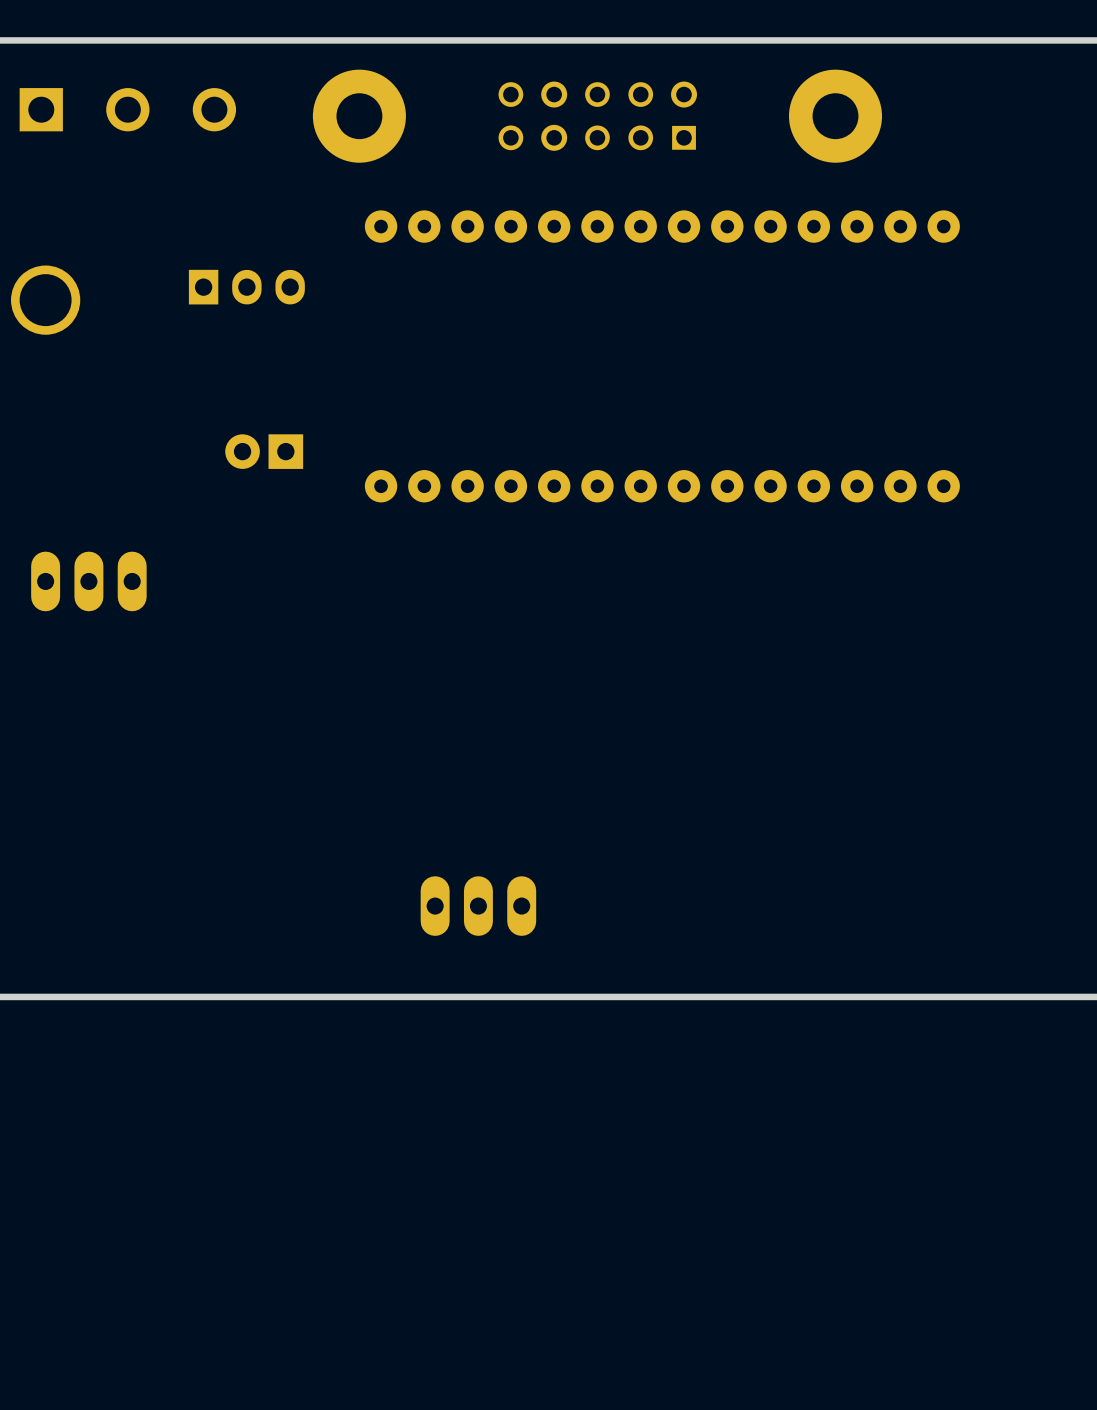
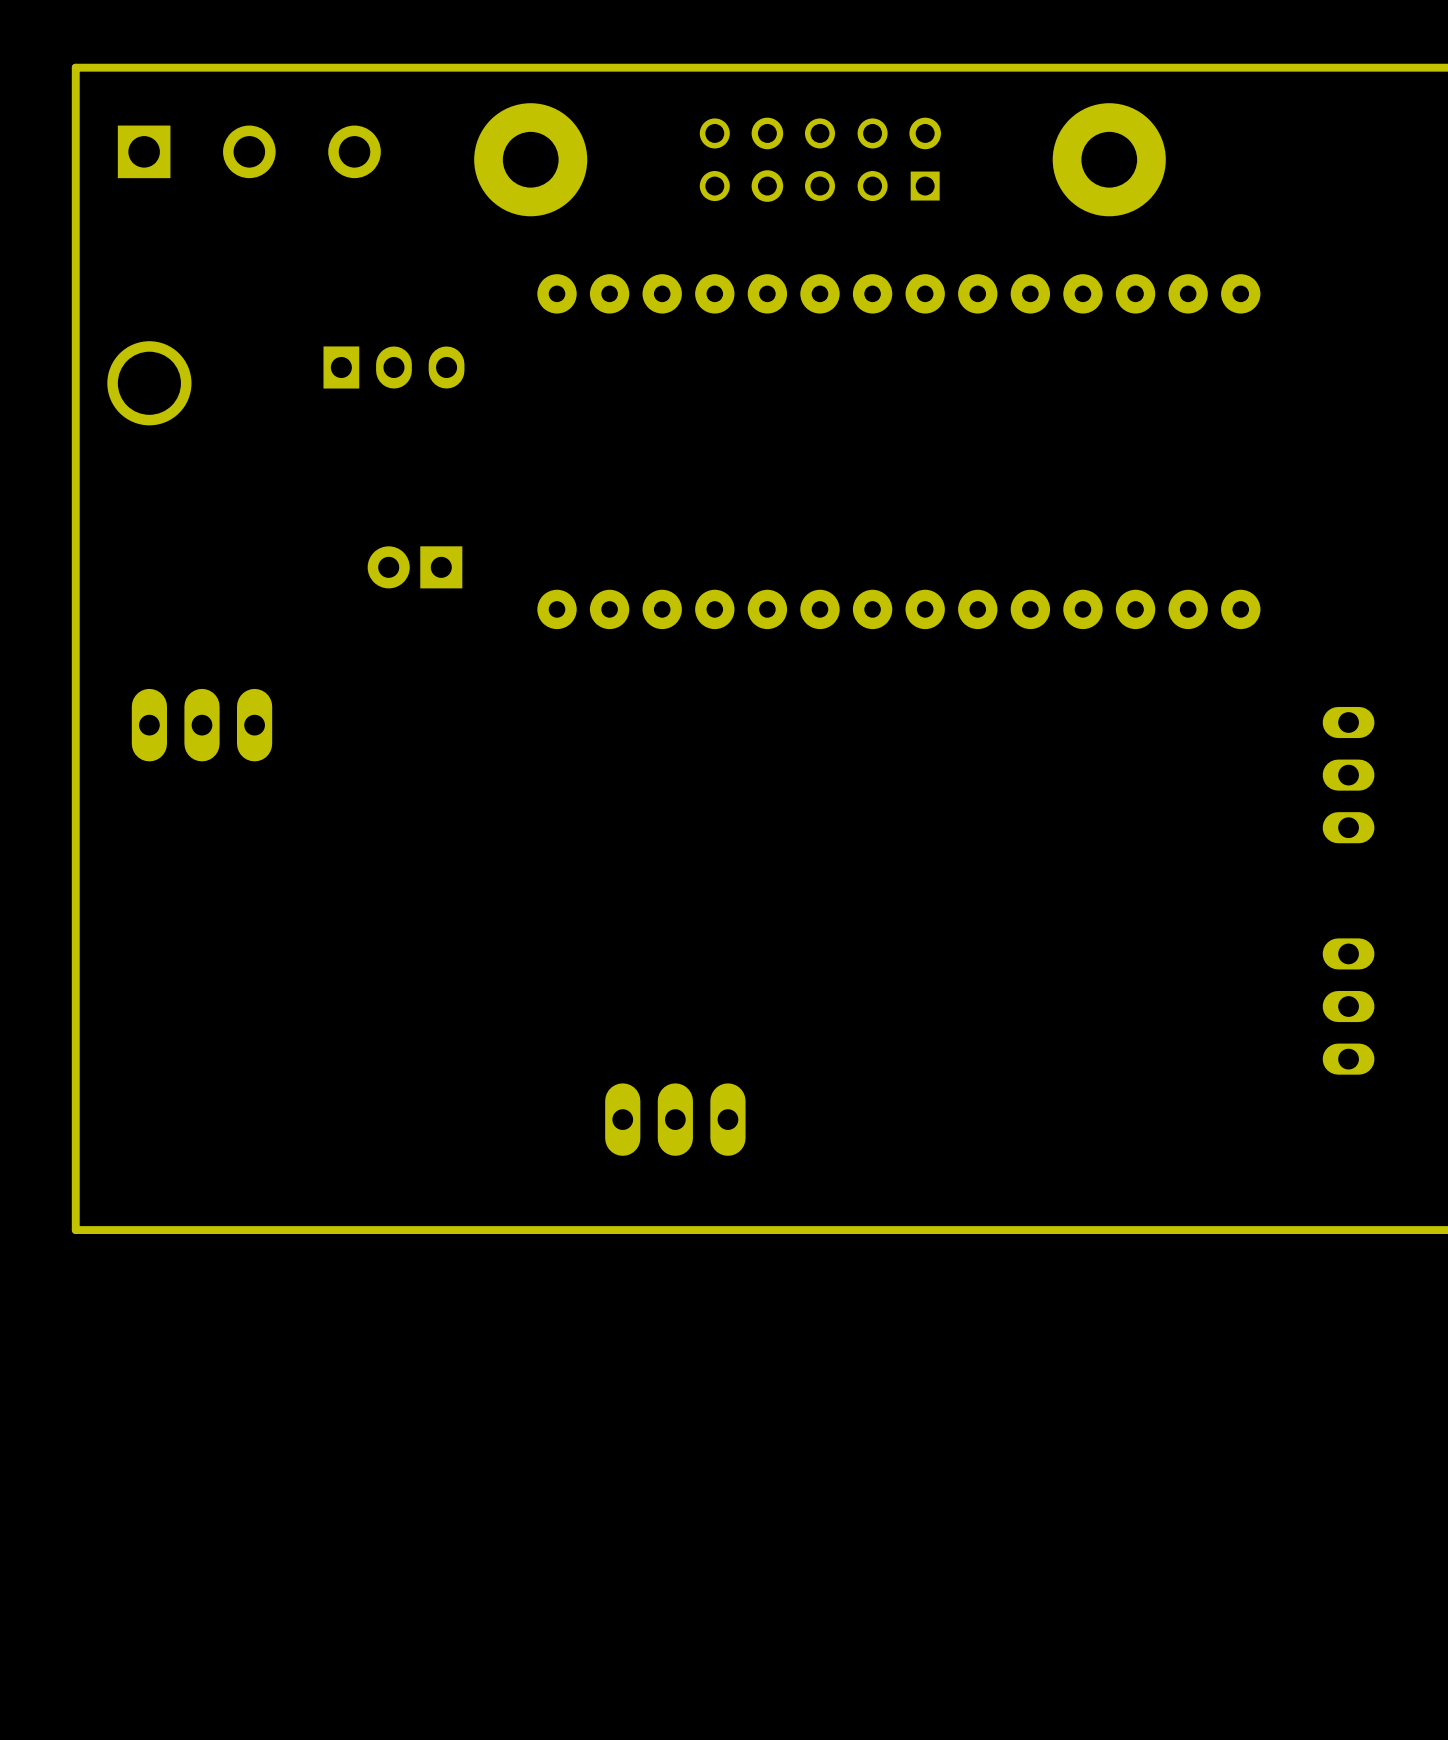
part: none -> (1348, 775)
part: none -> (1348, 1006)

